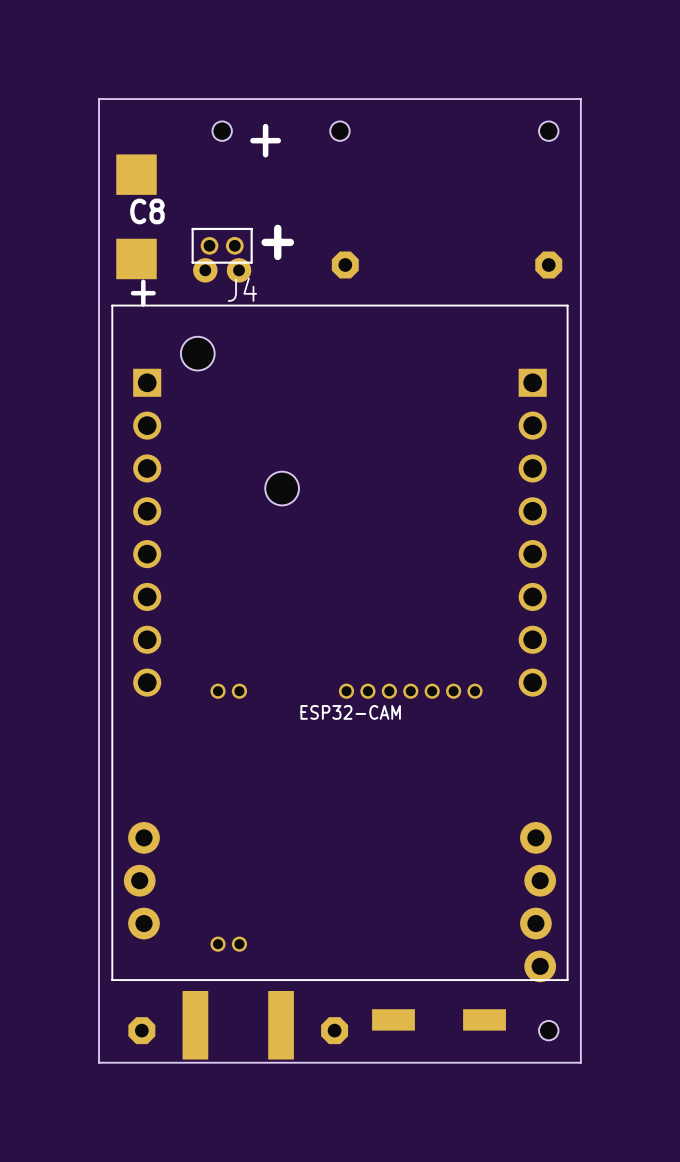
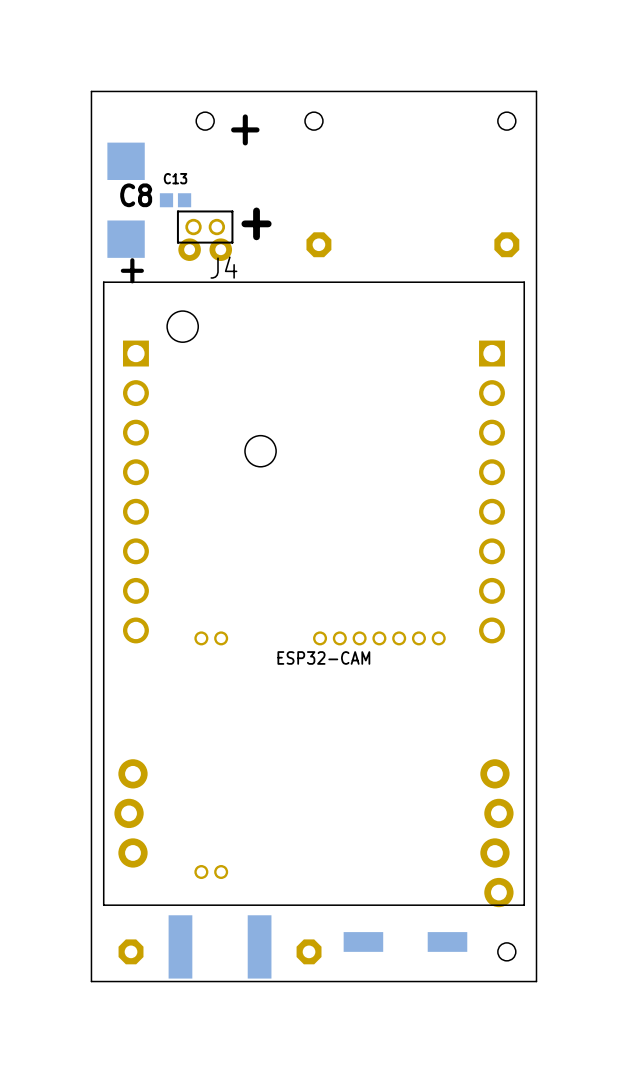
C13: none -> (175, 200)

